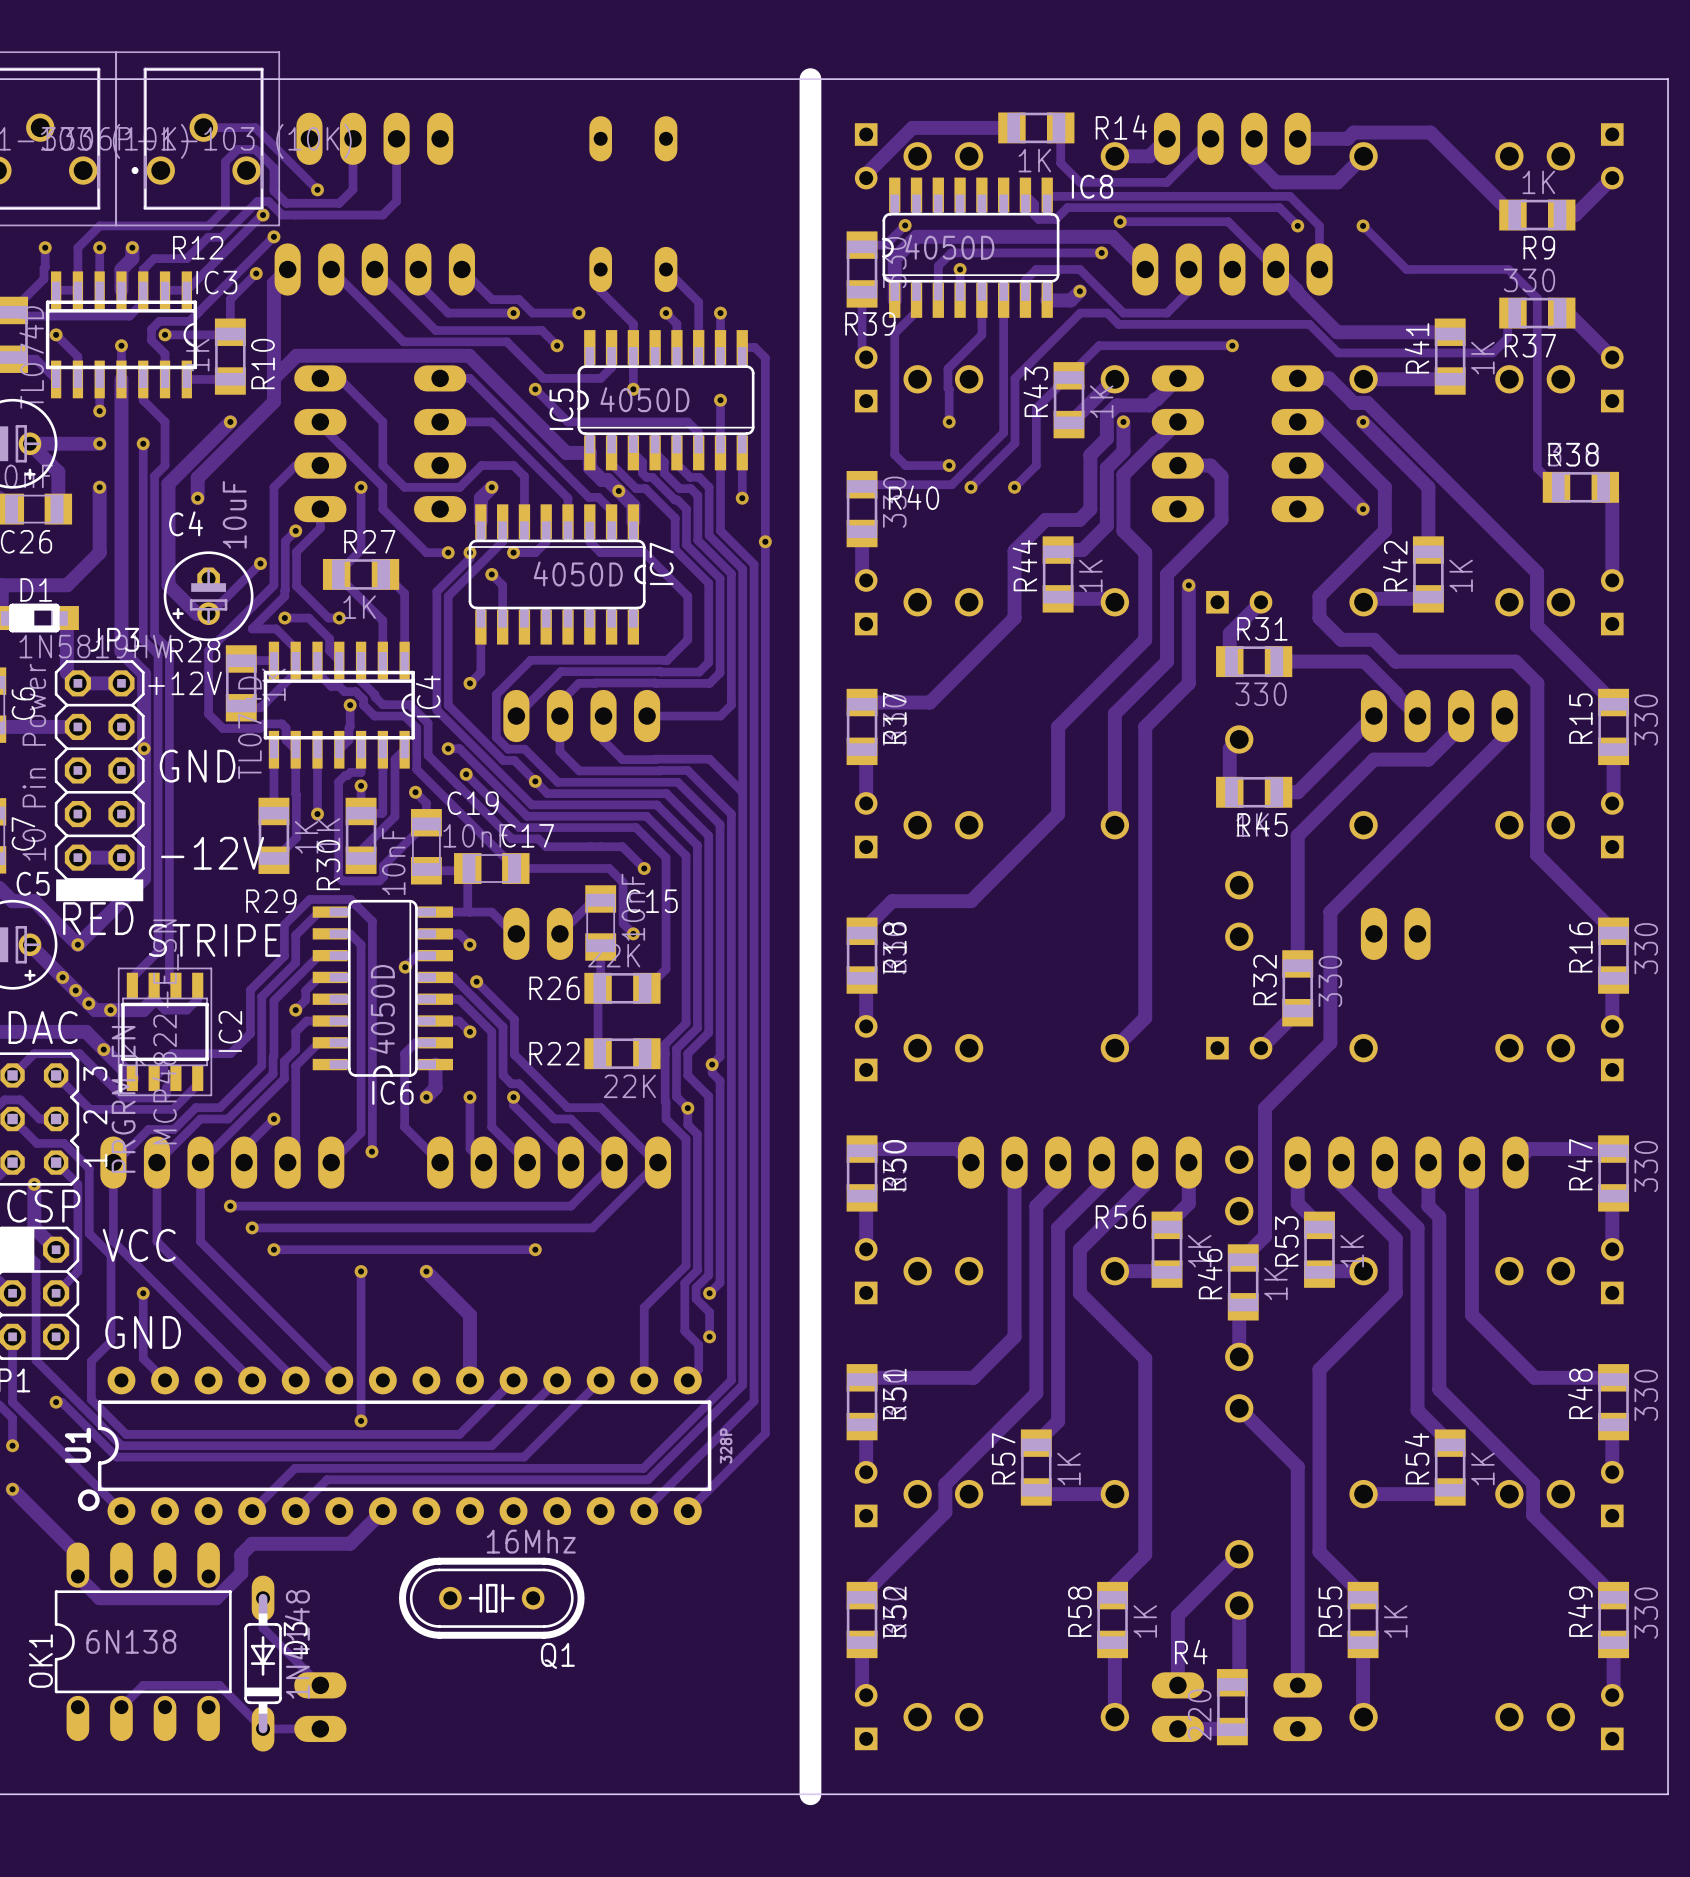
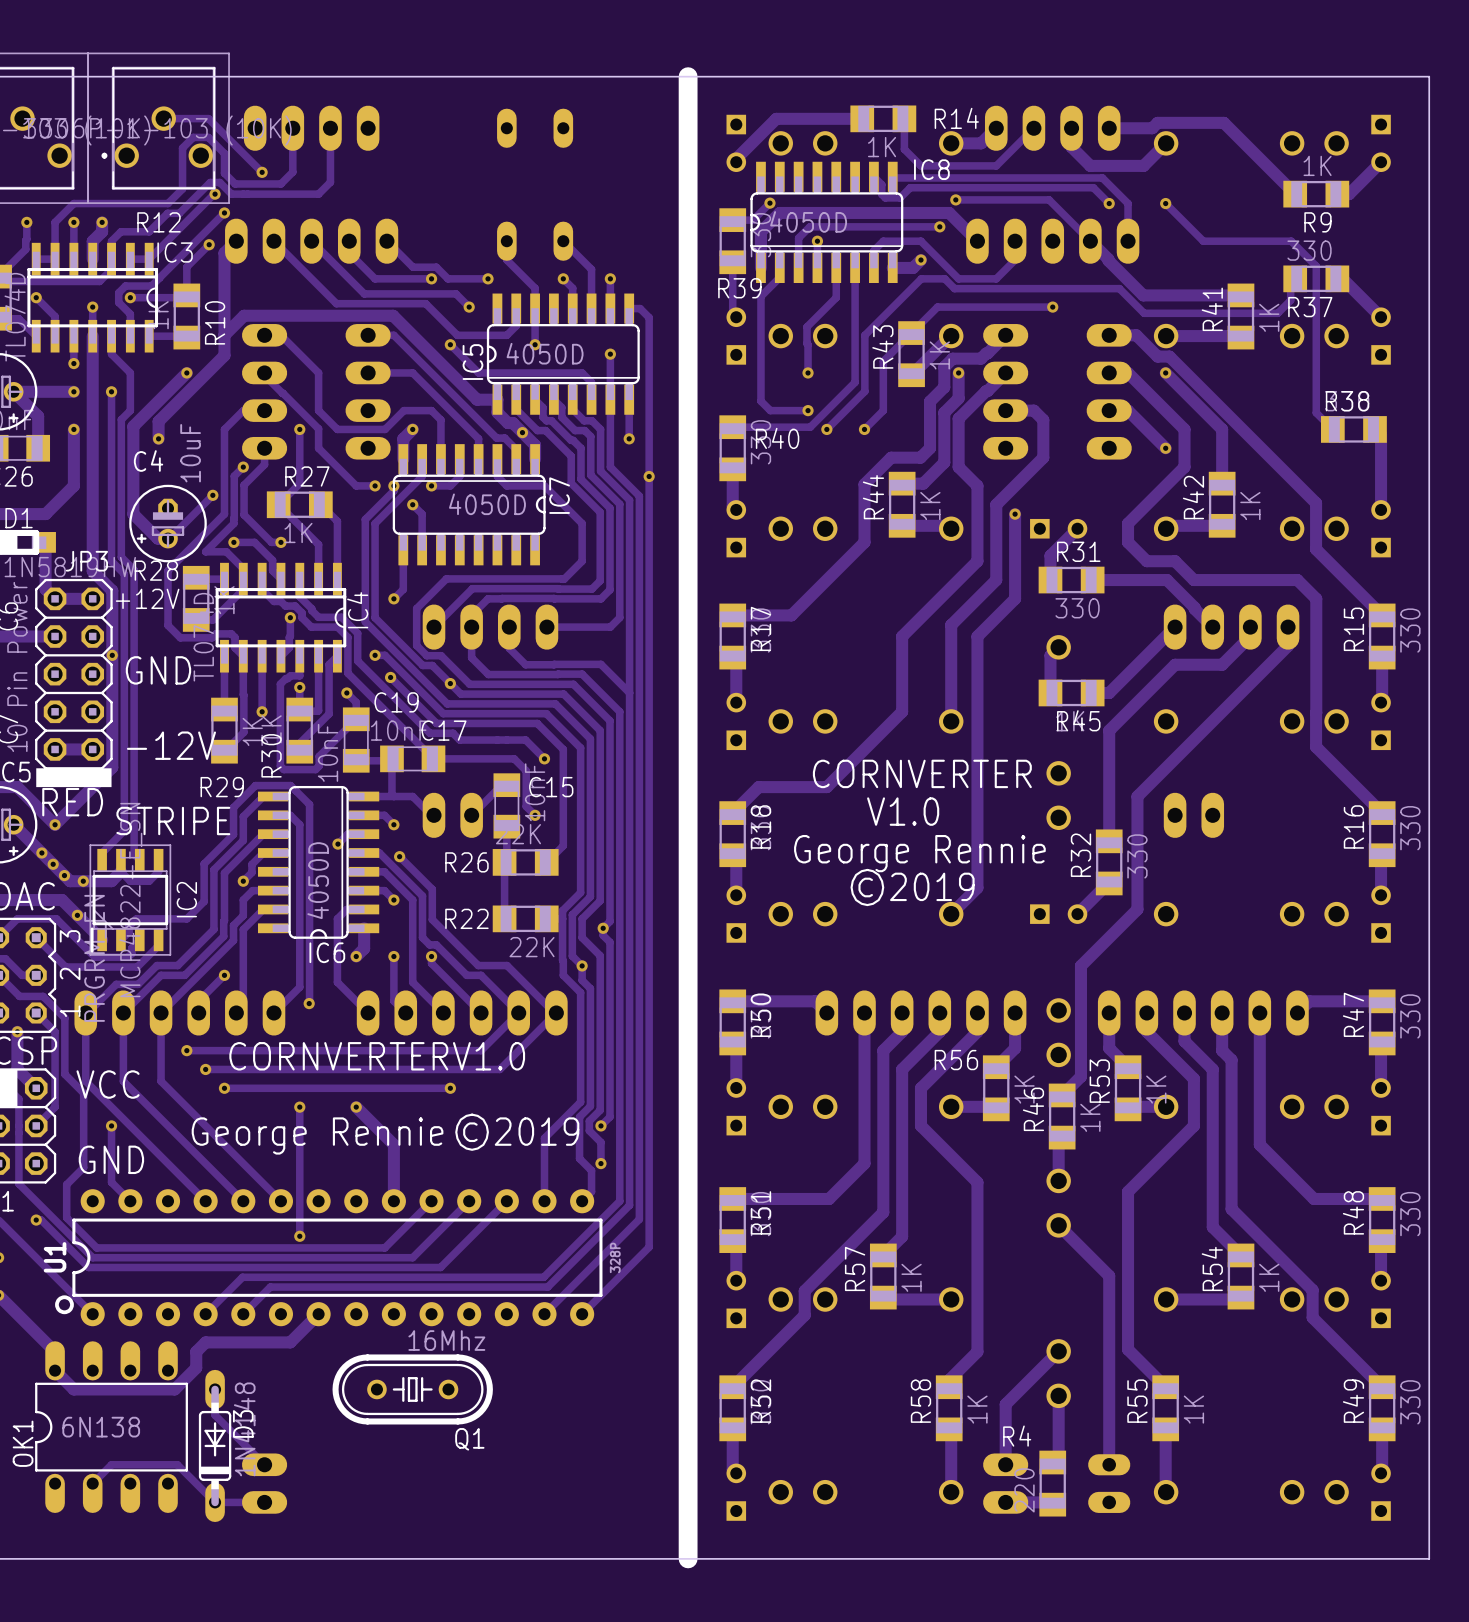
text: none -> CORNVERTER (922, 773)
text: none -> V1.0 (903, 811)
text: none -> George Rennie (919, 853)
text: none -> ©2019 (912, 887)
text: none -> CORNVERTER (338, 1056)
text: none -> V1.0 (489, 1056)
text: none -> ©2019 (517, 1132)
text: none -> George Rennie (317, 1135)

